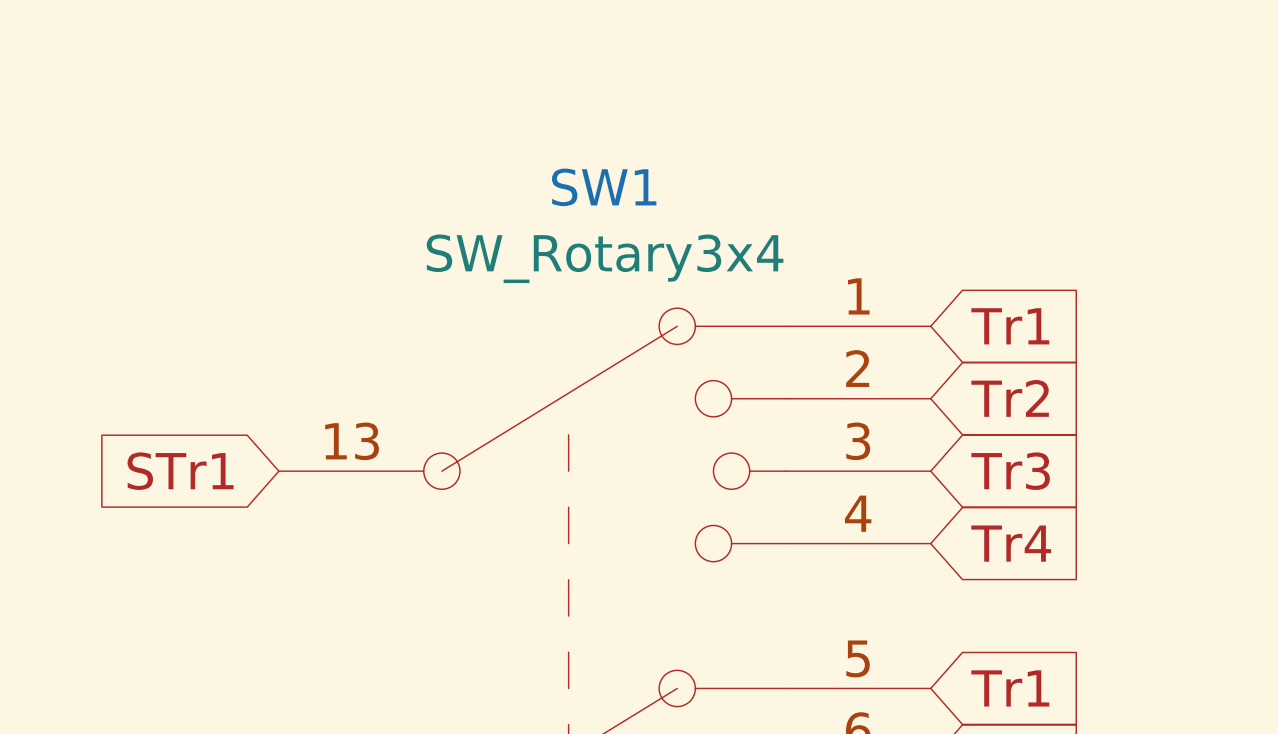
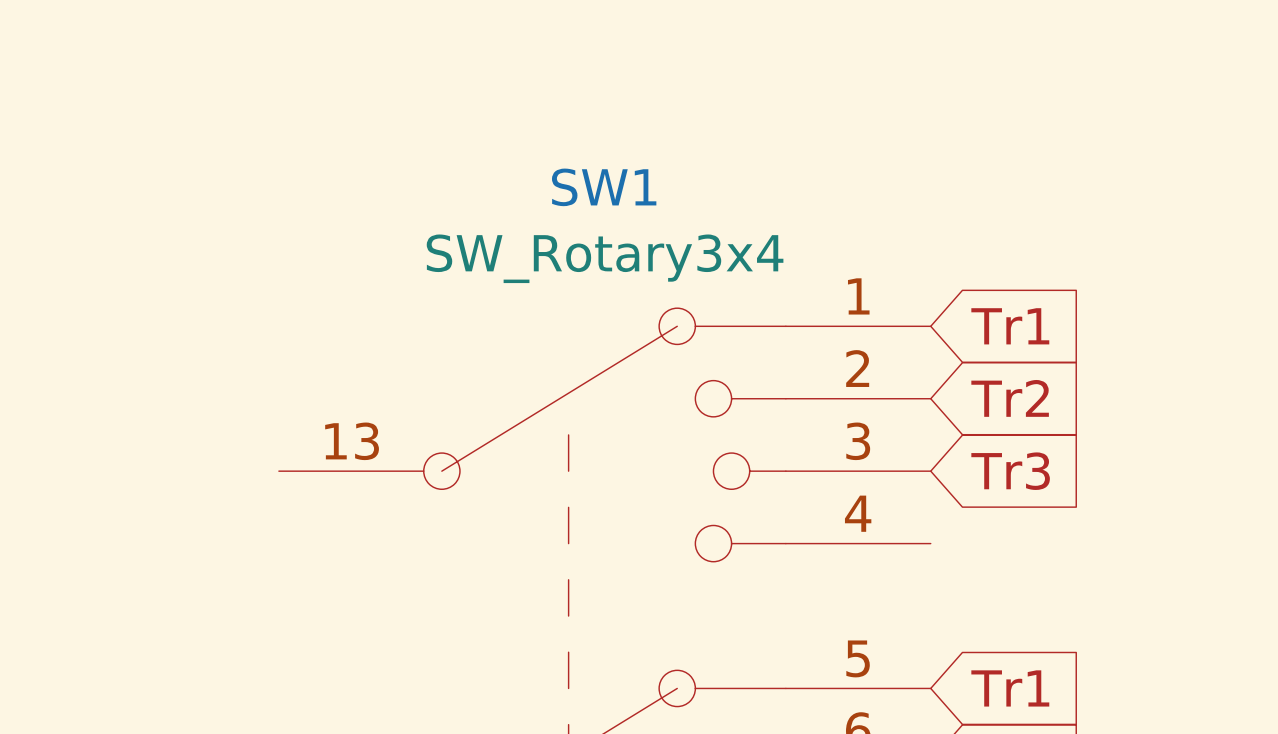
global label: STr1 (180, 471) -> none
global label: Tr4 (1011, 543) -> none

